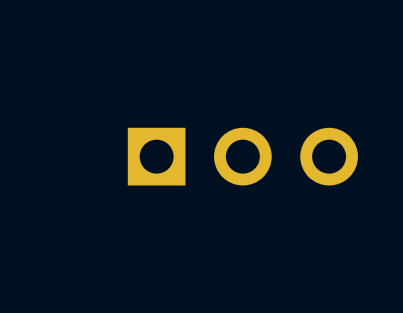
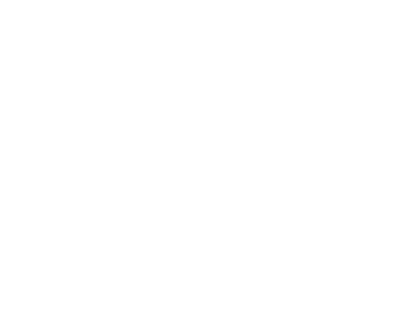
part: (242, 156) -> none

